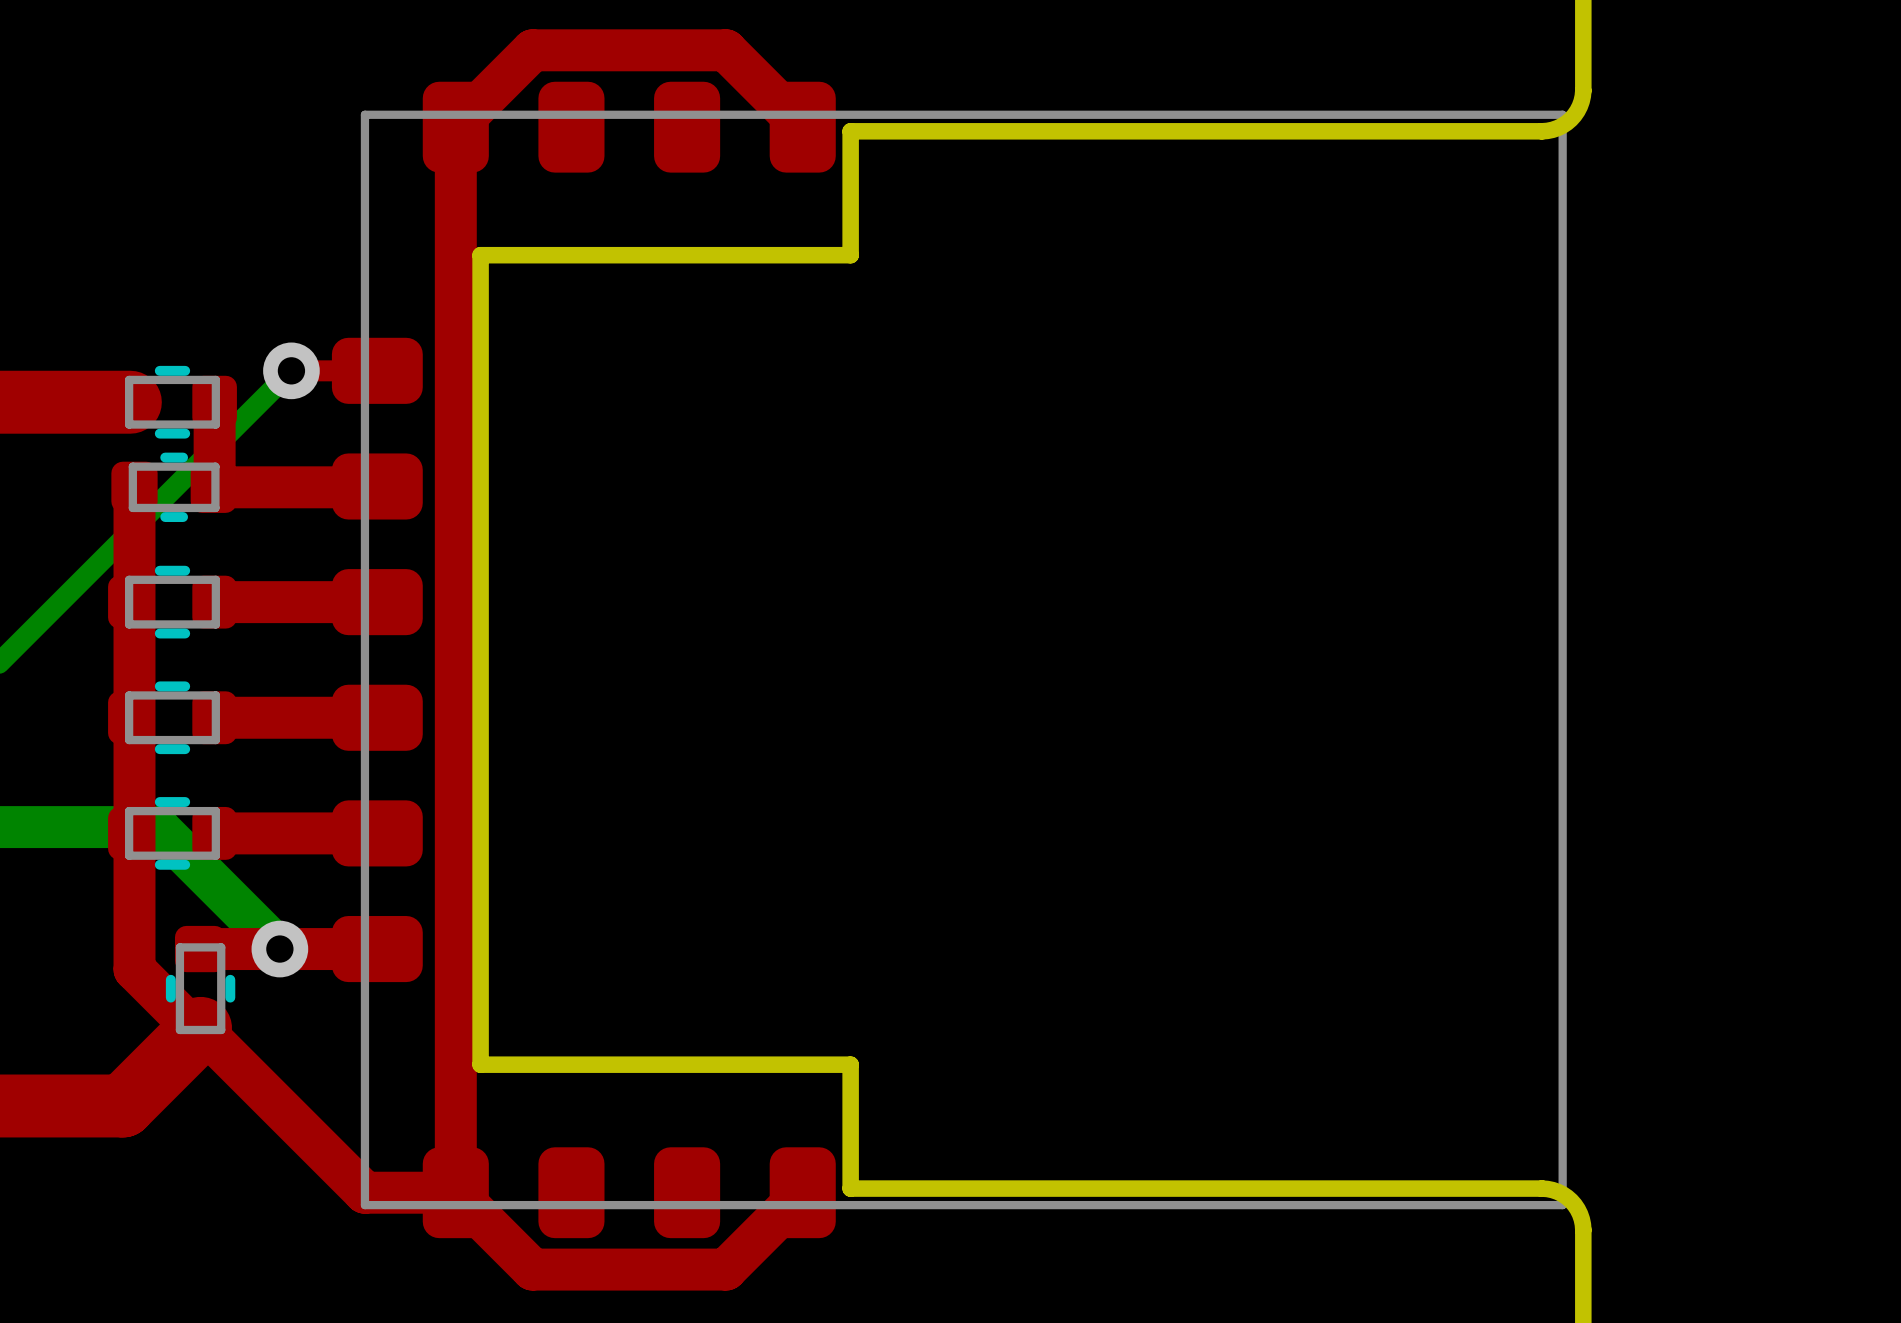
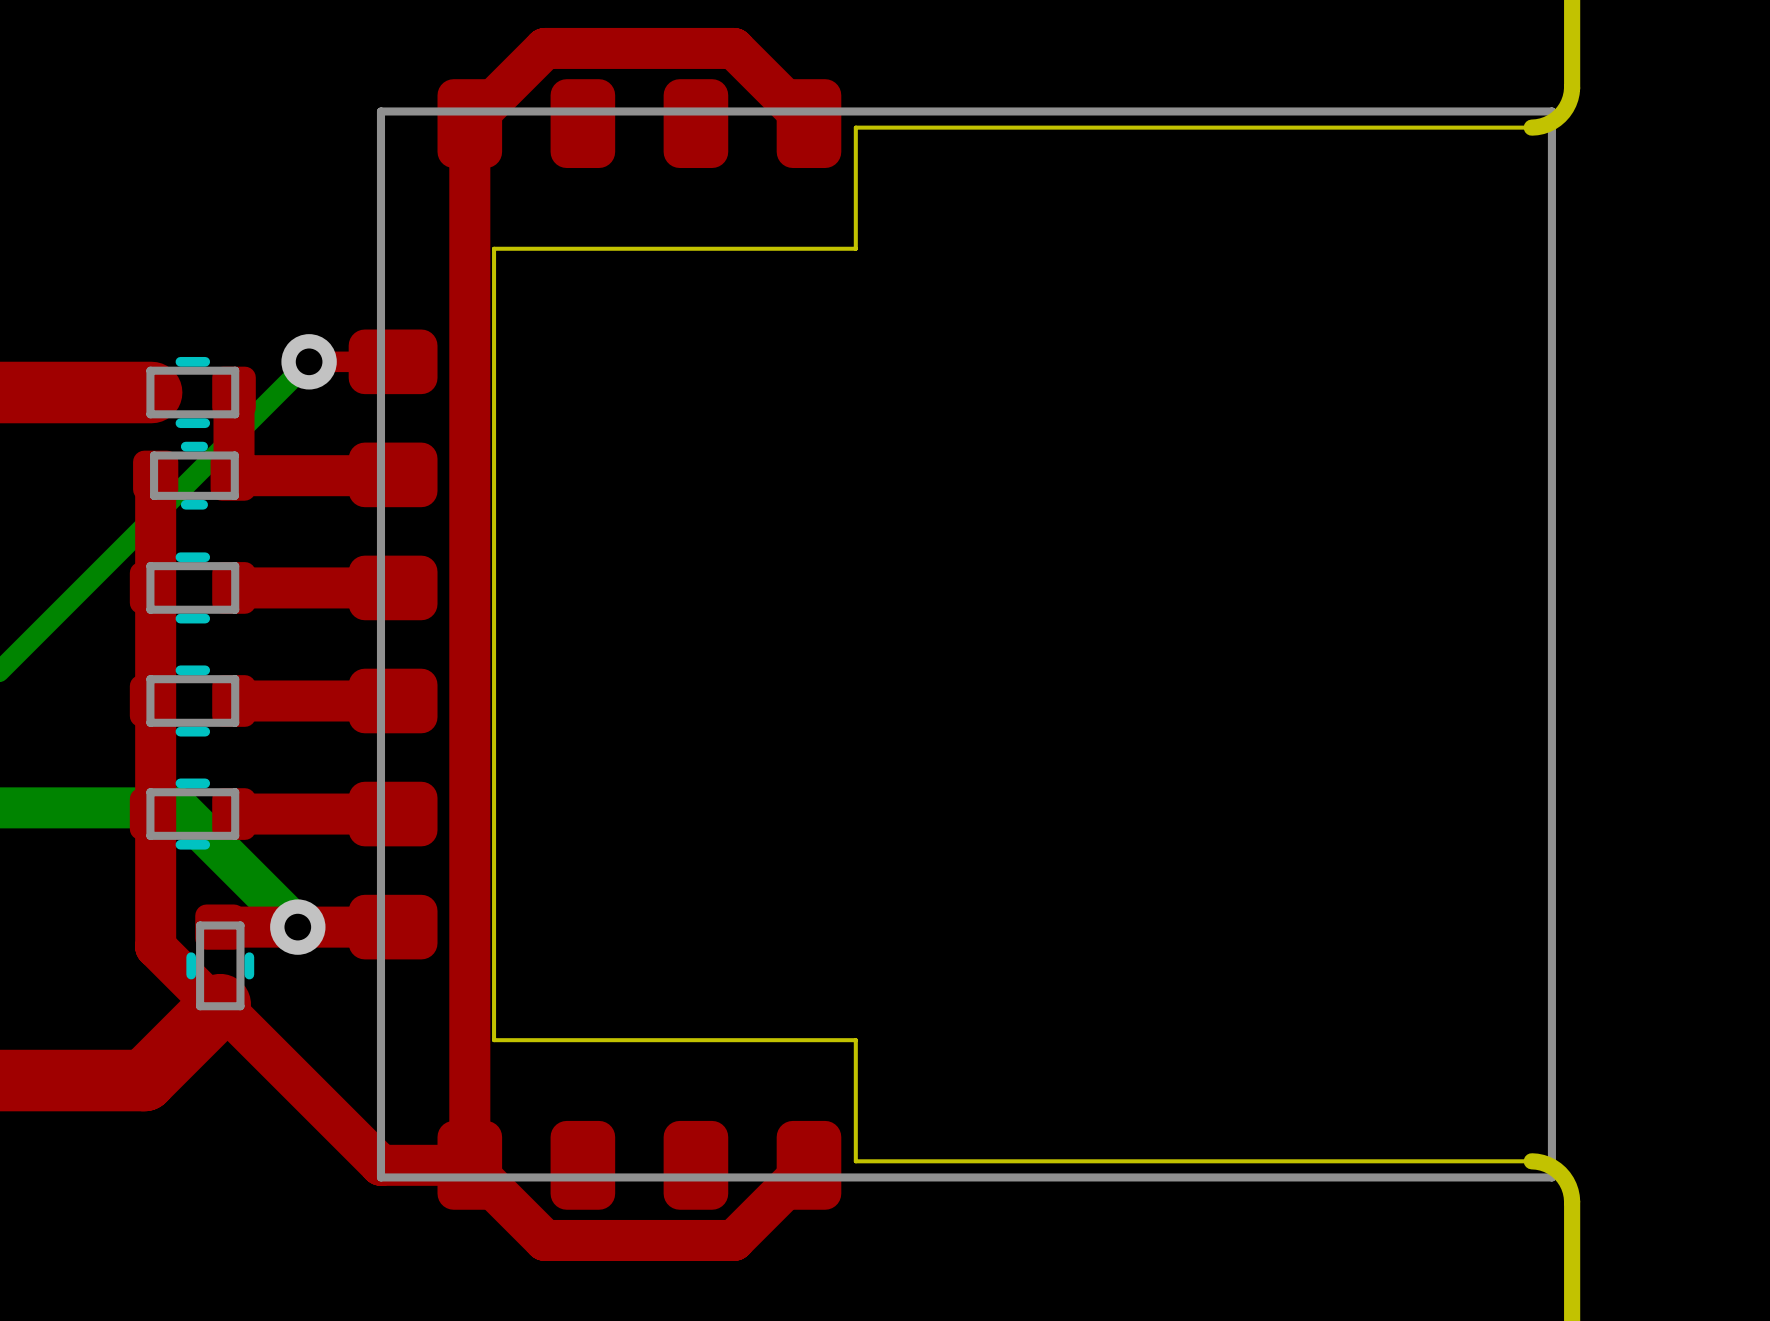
part footprint: [331, 81, 1567, 1239] -> [348, 79, 1556, 1210]

